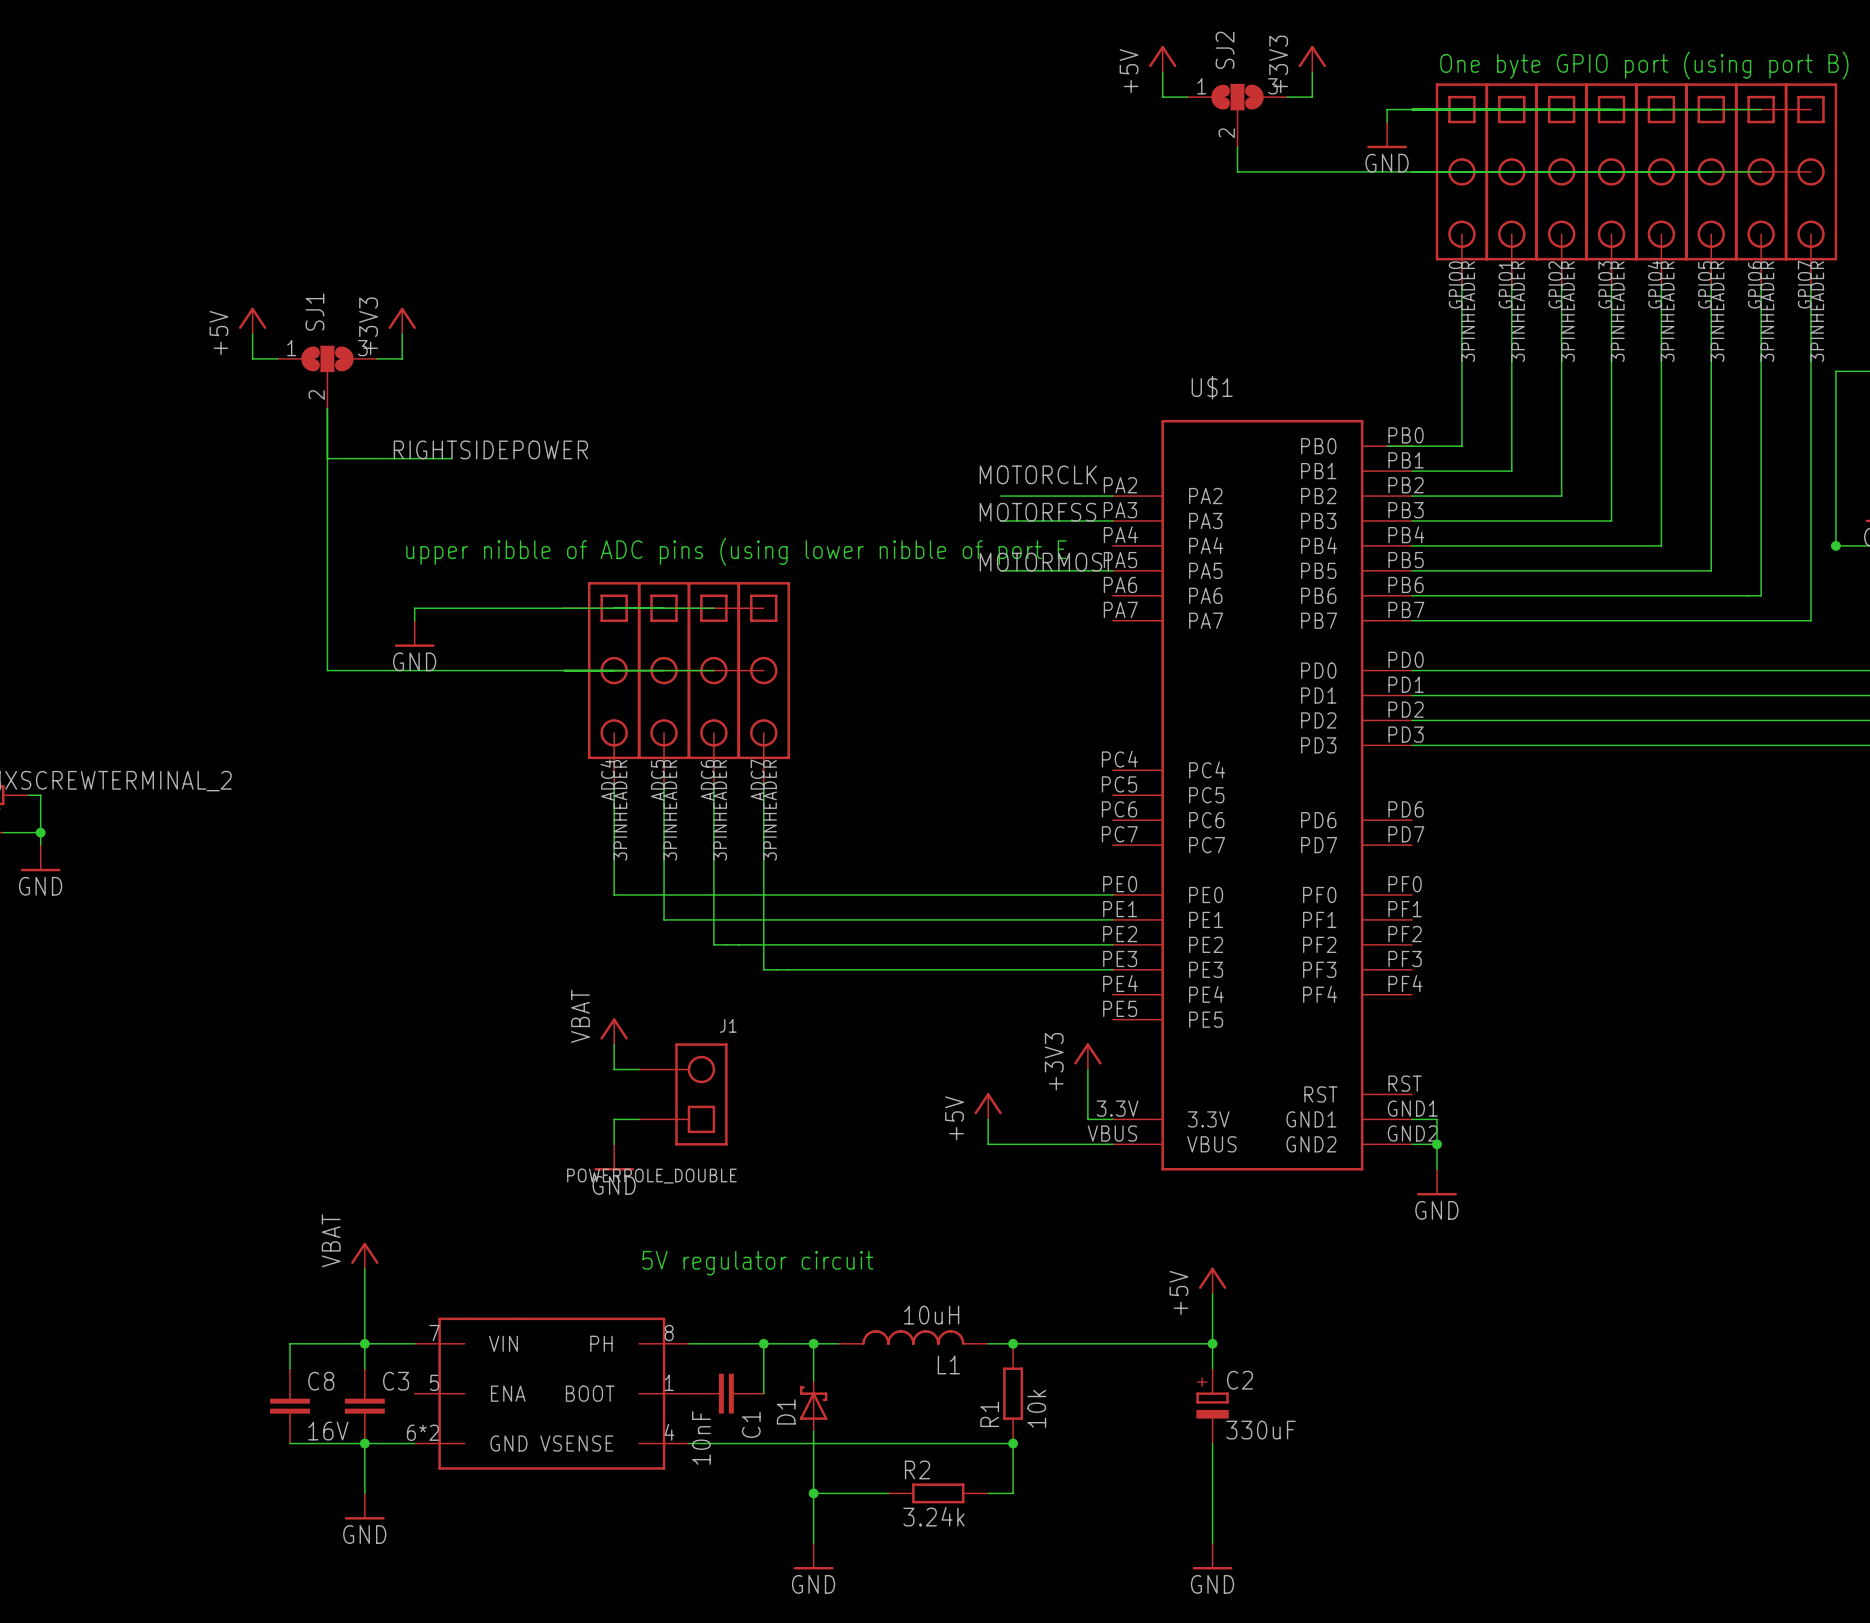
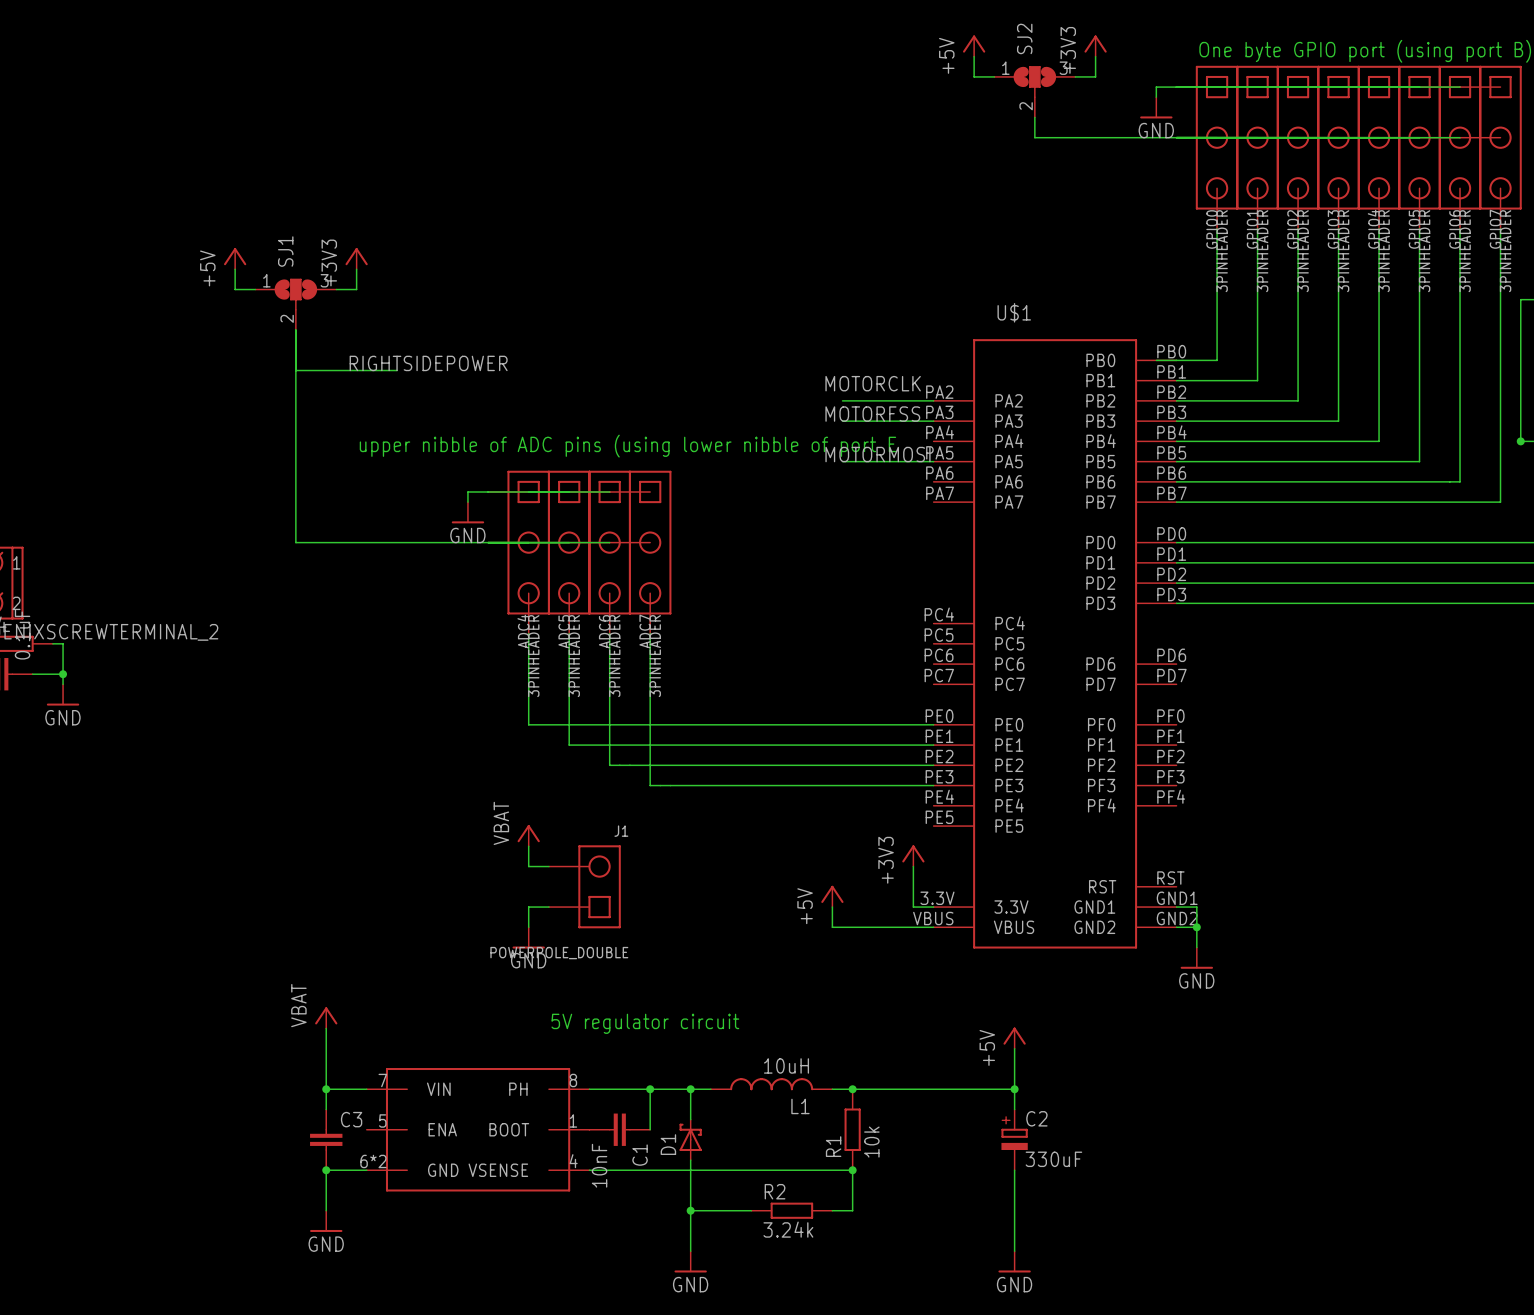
wire: (539, 608) (414, 608) (414, 620) -> (467, 491) (467, 502)
power symbol position: GND (414, 633) -> GND (467, 512)
wire: (364, 1343) (290, 1343) (290, 1368) -> none
C8: 16V (290, 1406) -> none
wire: (290, 1443) (364, 1443) -> none

